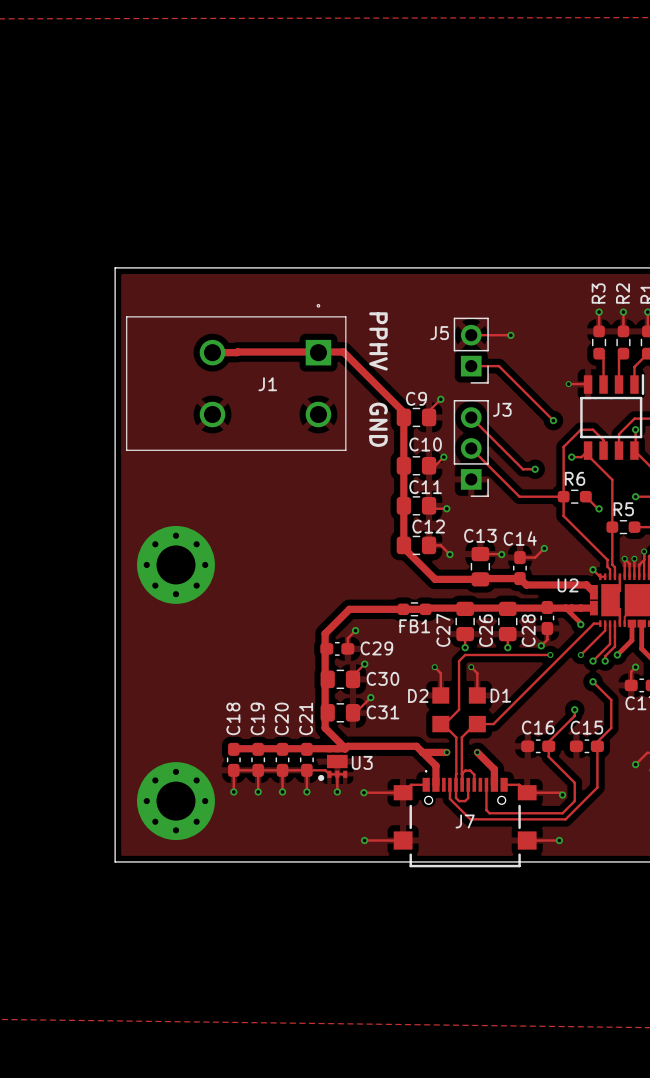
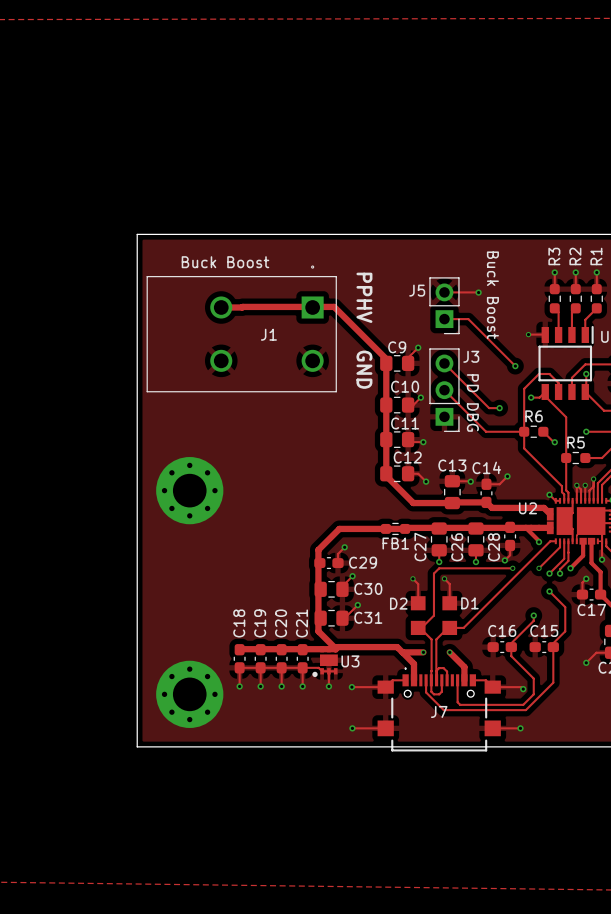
text: none -> Buck Boost (225, 262)
text: none -> Buck Boost (492, 295)
text: none -> PD DBG (472, 403)

